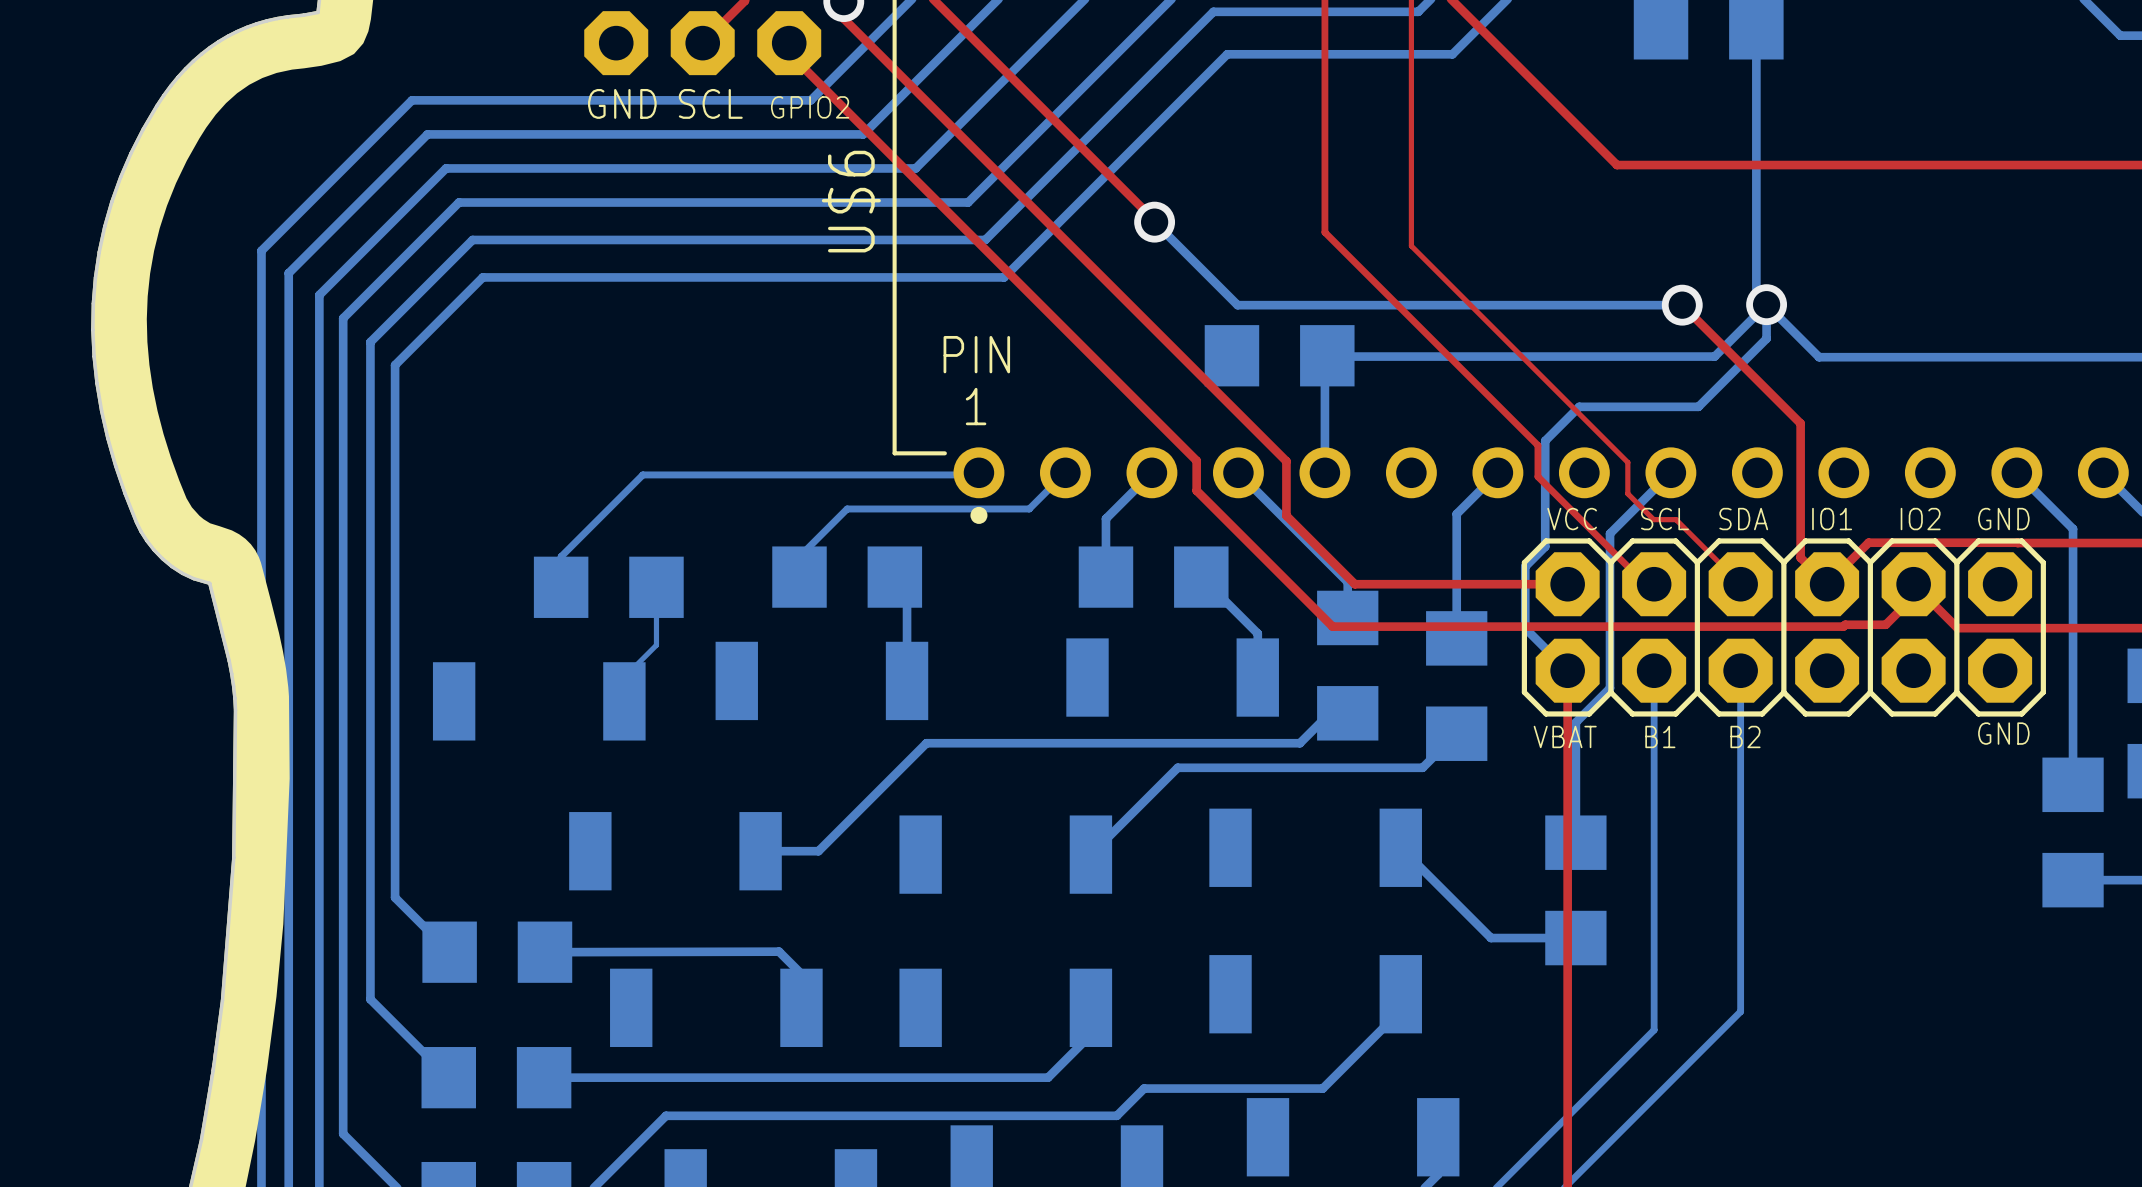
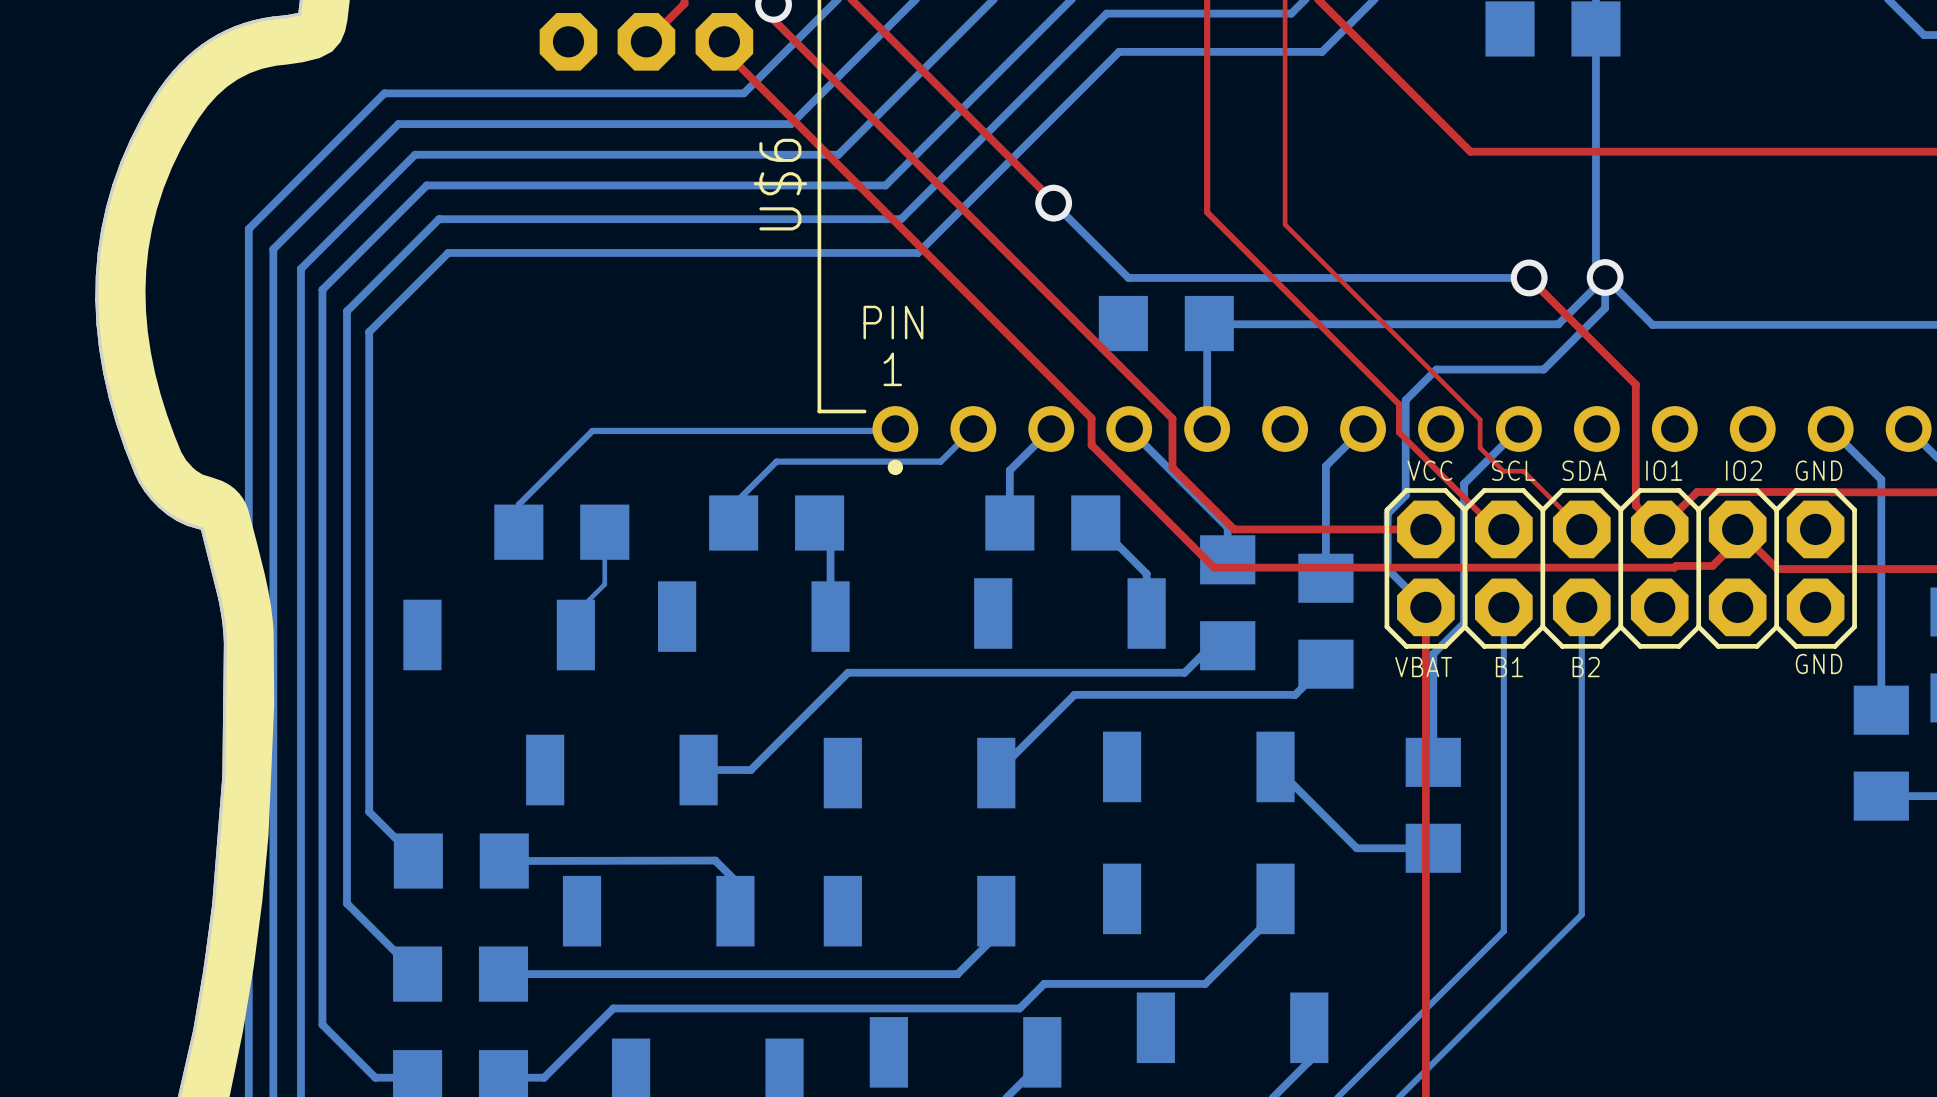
text: GND (622, 103) -> none
text: SCL (710, 103) -> none
text: GPIO2 (810, 107) -> none

